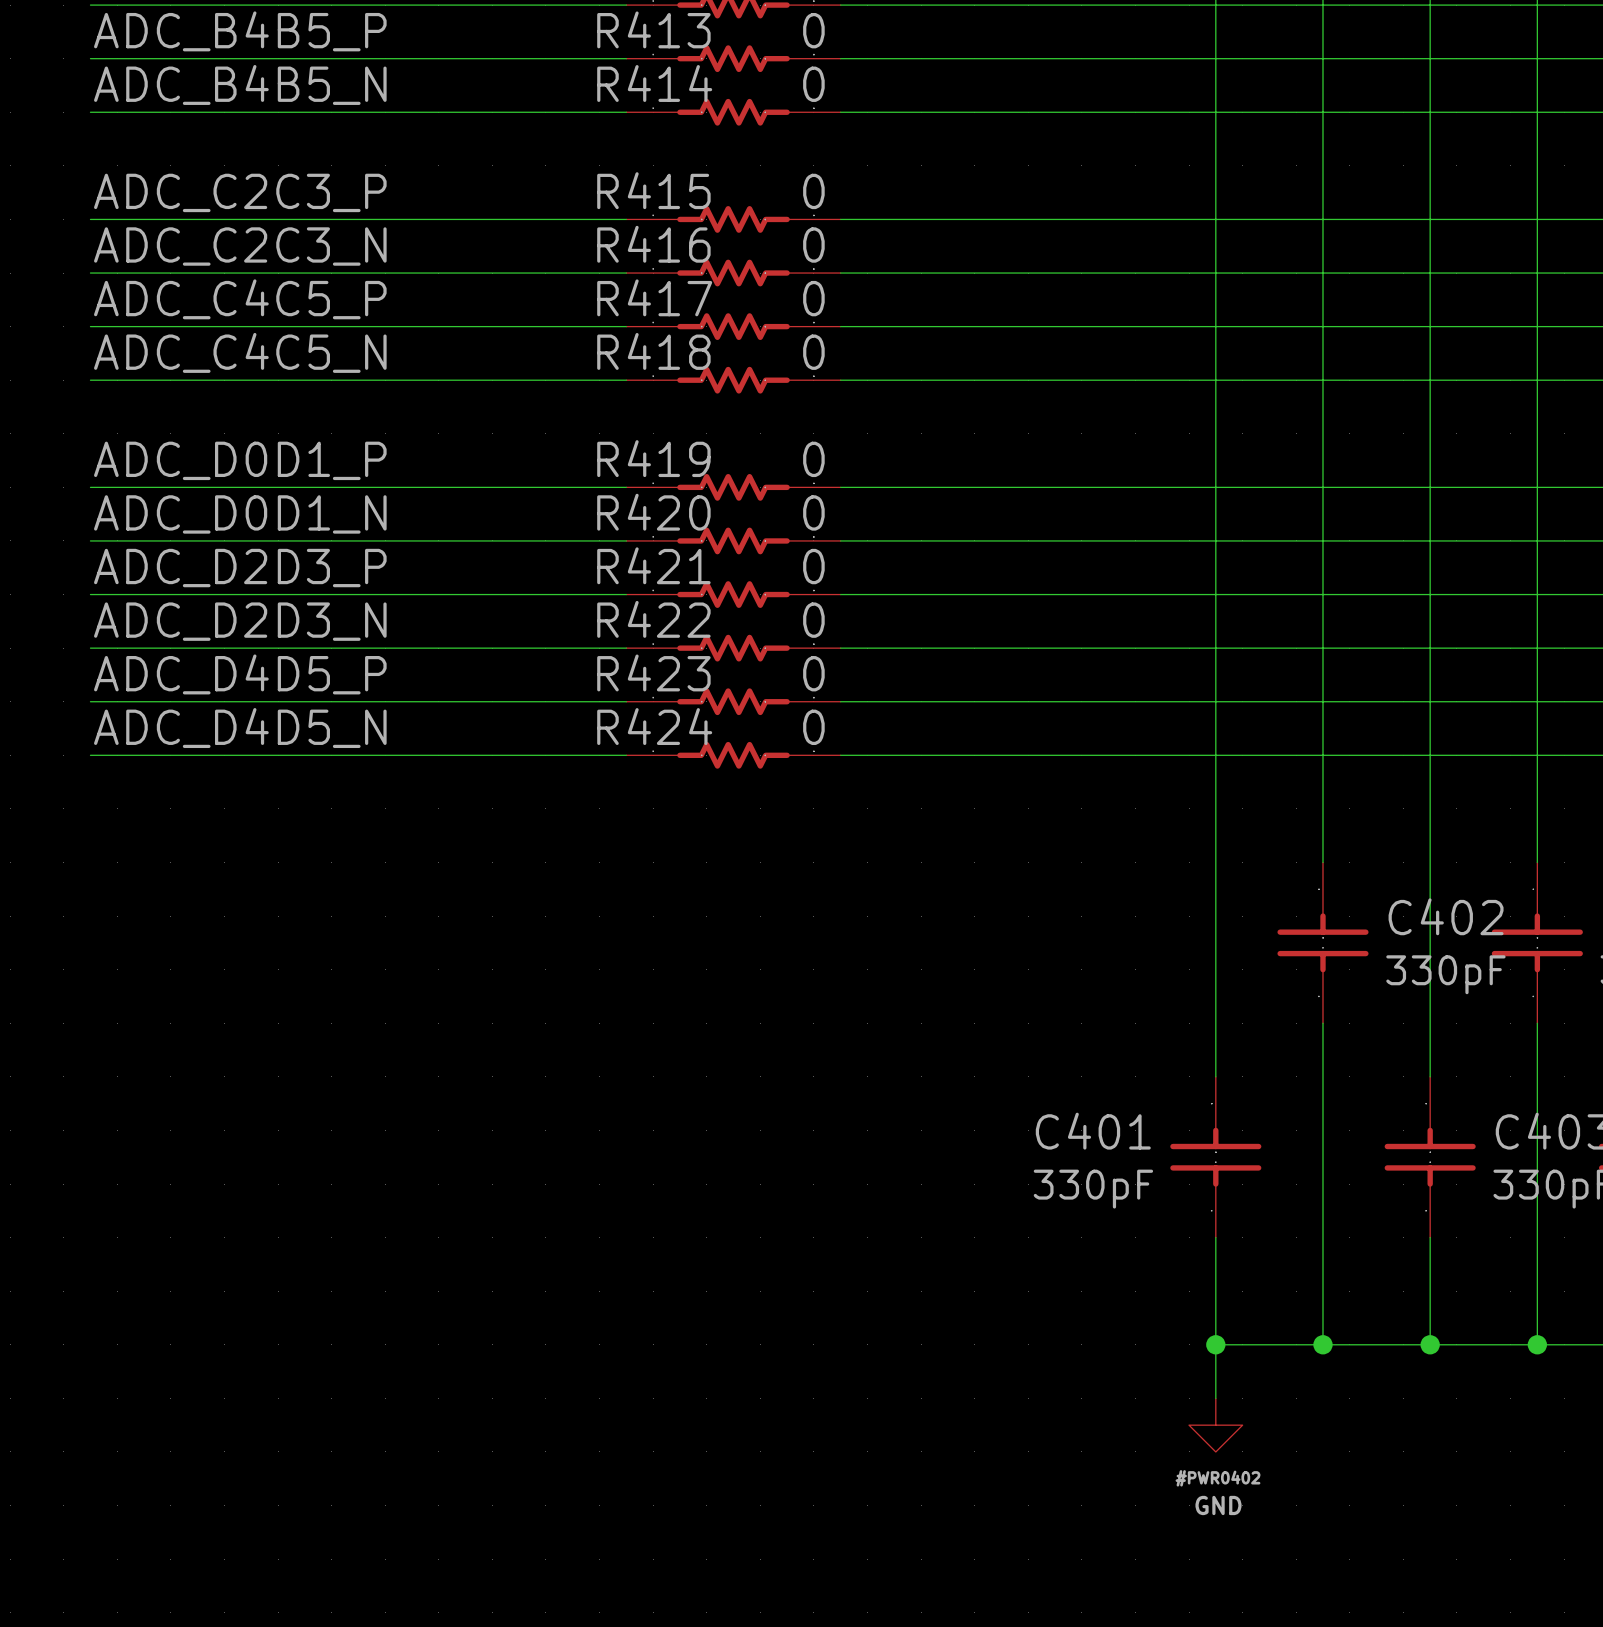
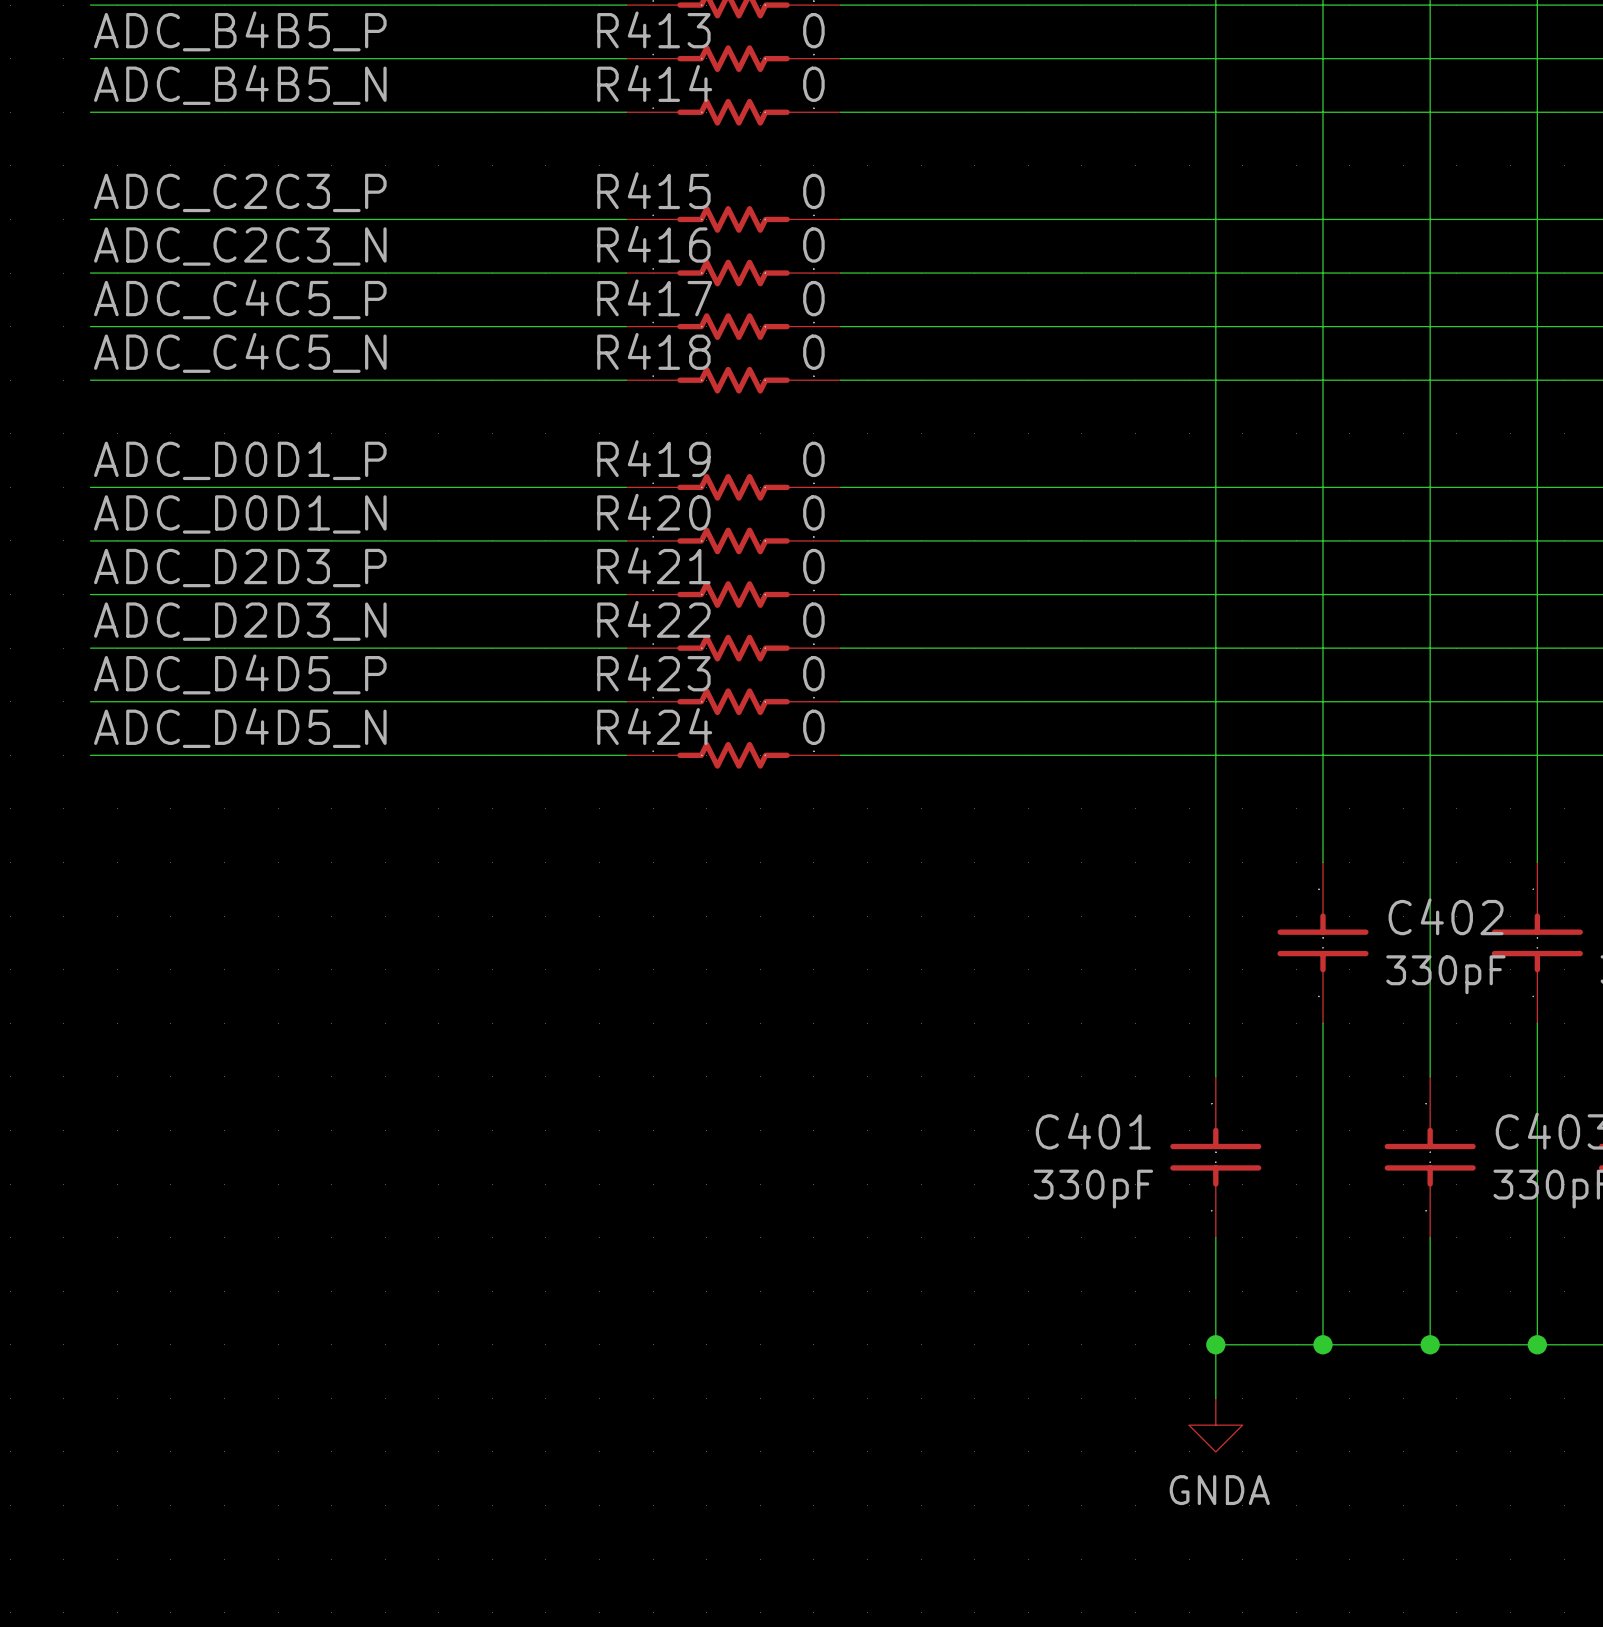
power symbol: GND (1215, 1425) -> GNDA (1215, 1425)

